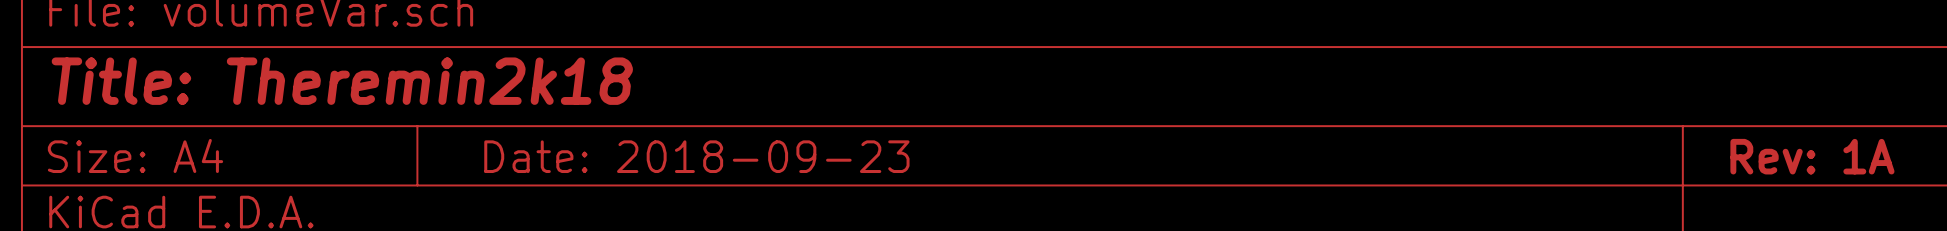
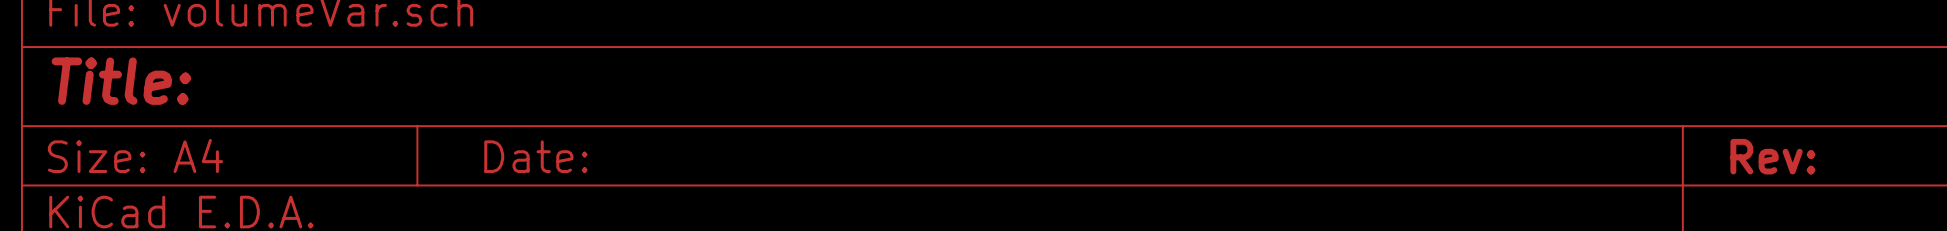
title block: Title: Theremin2k18 (342, 81) -> Title: (121, 81)
title block: Date: 2018-09-23 (696, 156) -> Date: (535, 156)
title block: Rev: 1A (1812, 156) -> Rev: (1772, 156)

